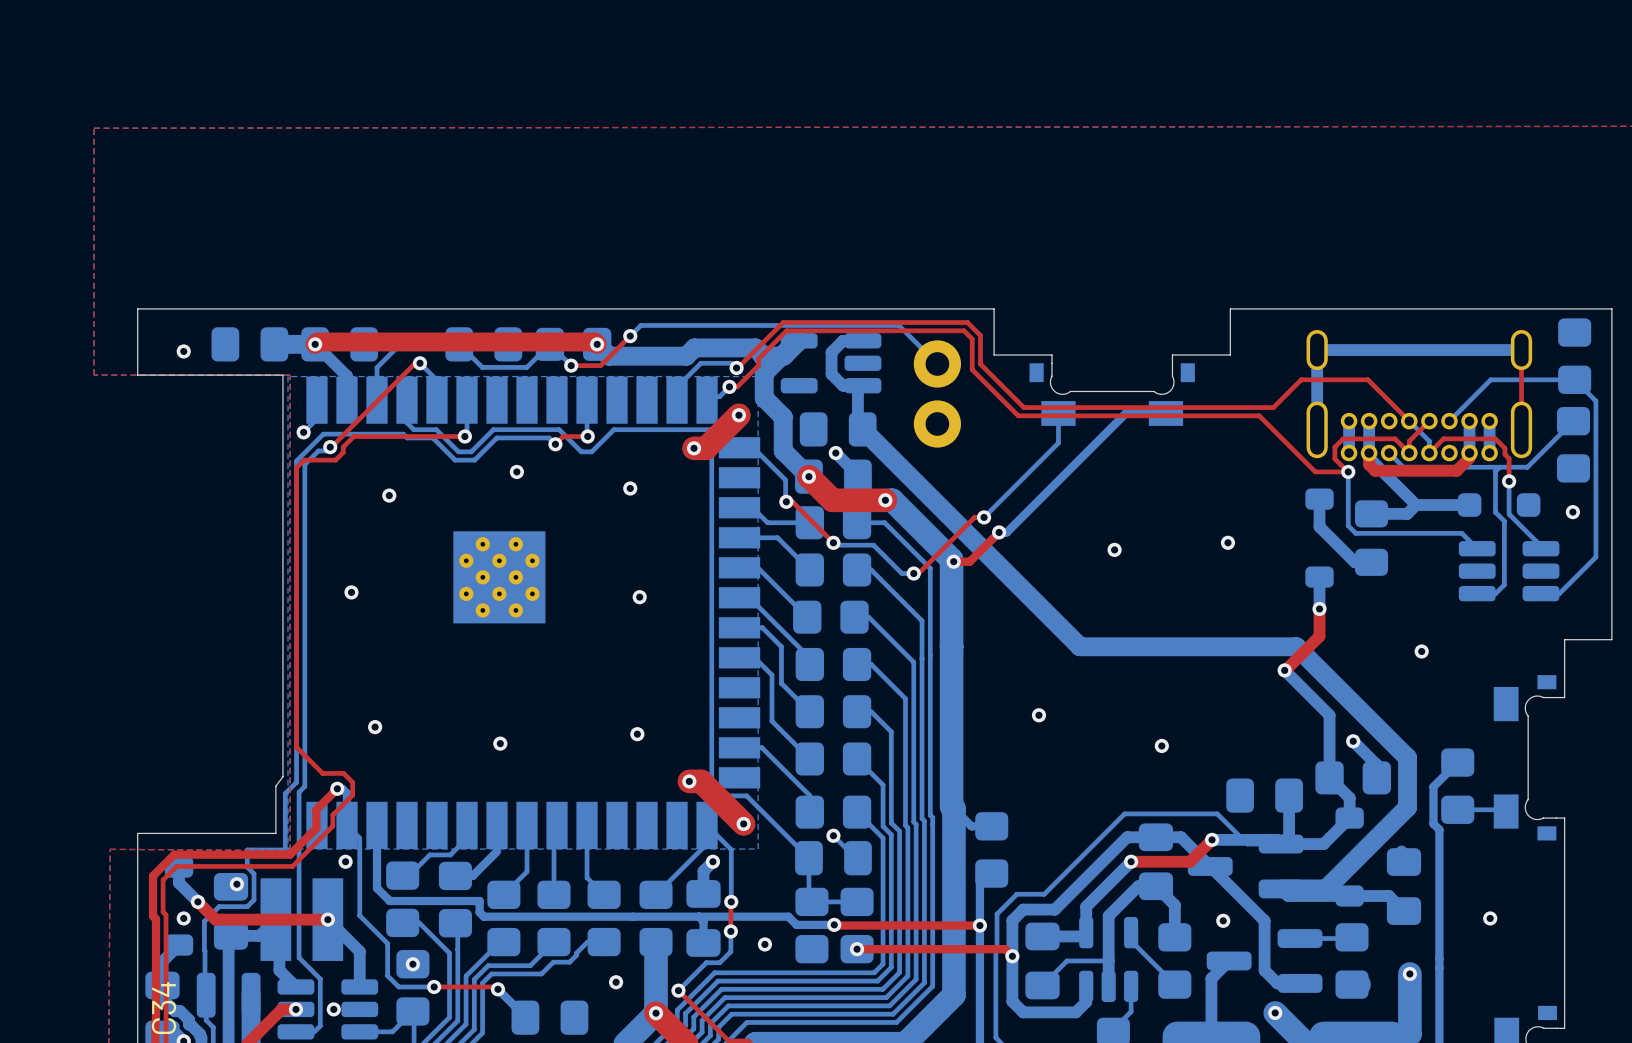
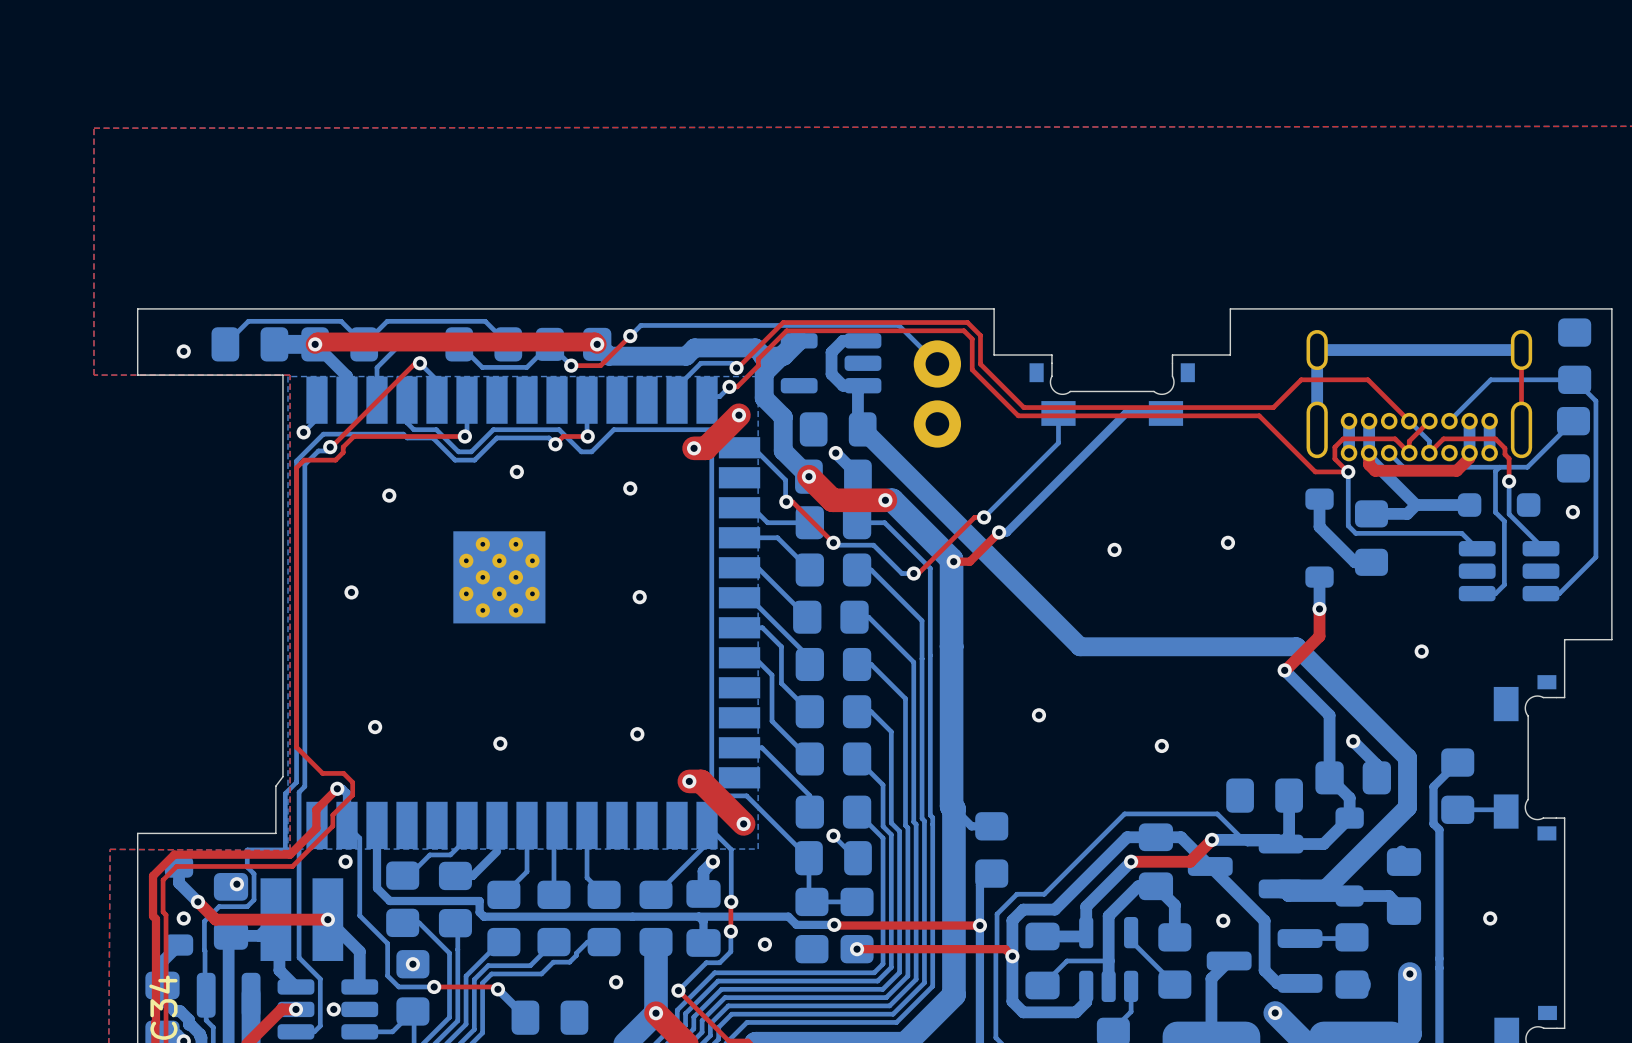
bottom track: none -> (225, 344) (248, 321) (341, 321) (364, 344) (387, 321) (485, 321) (508, 344)

